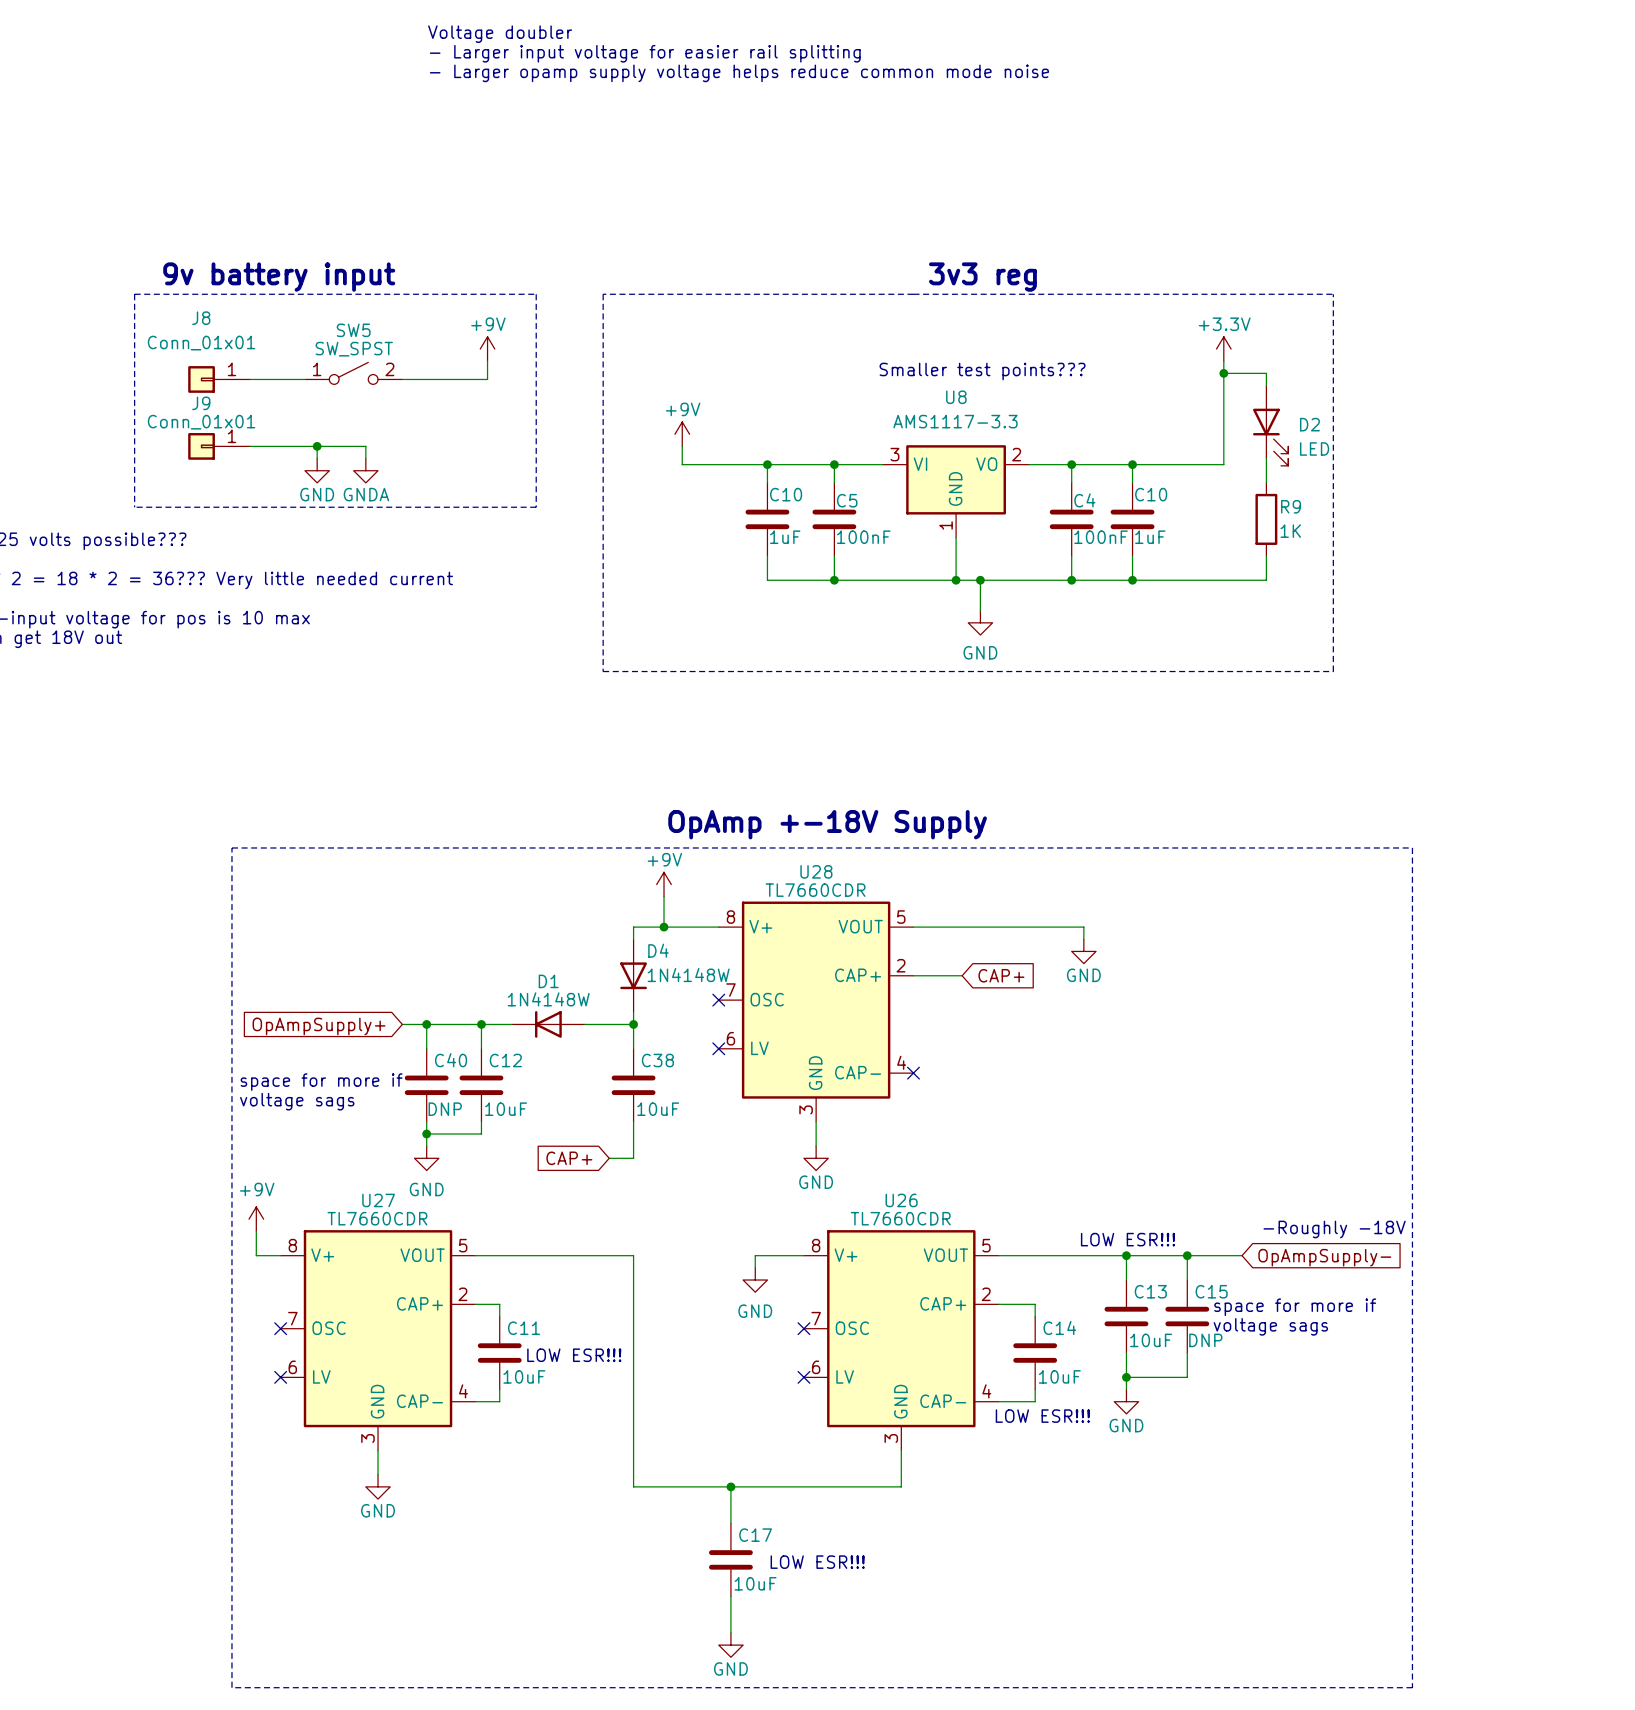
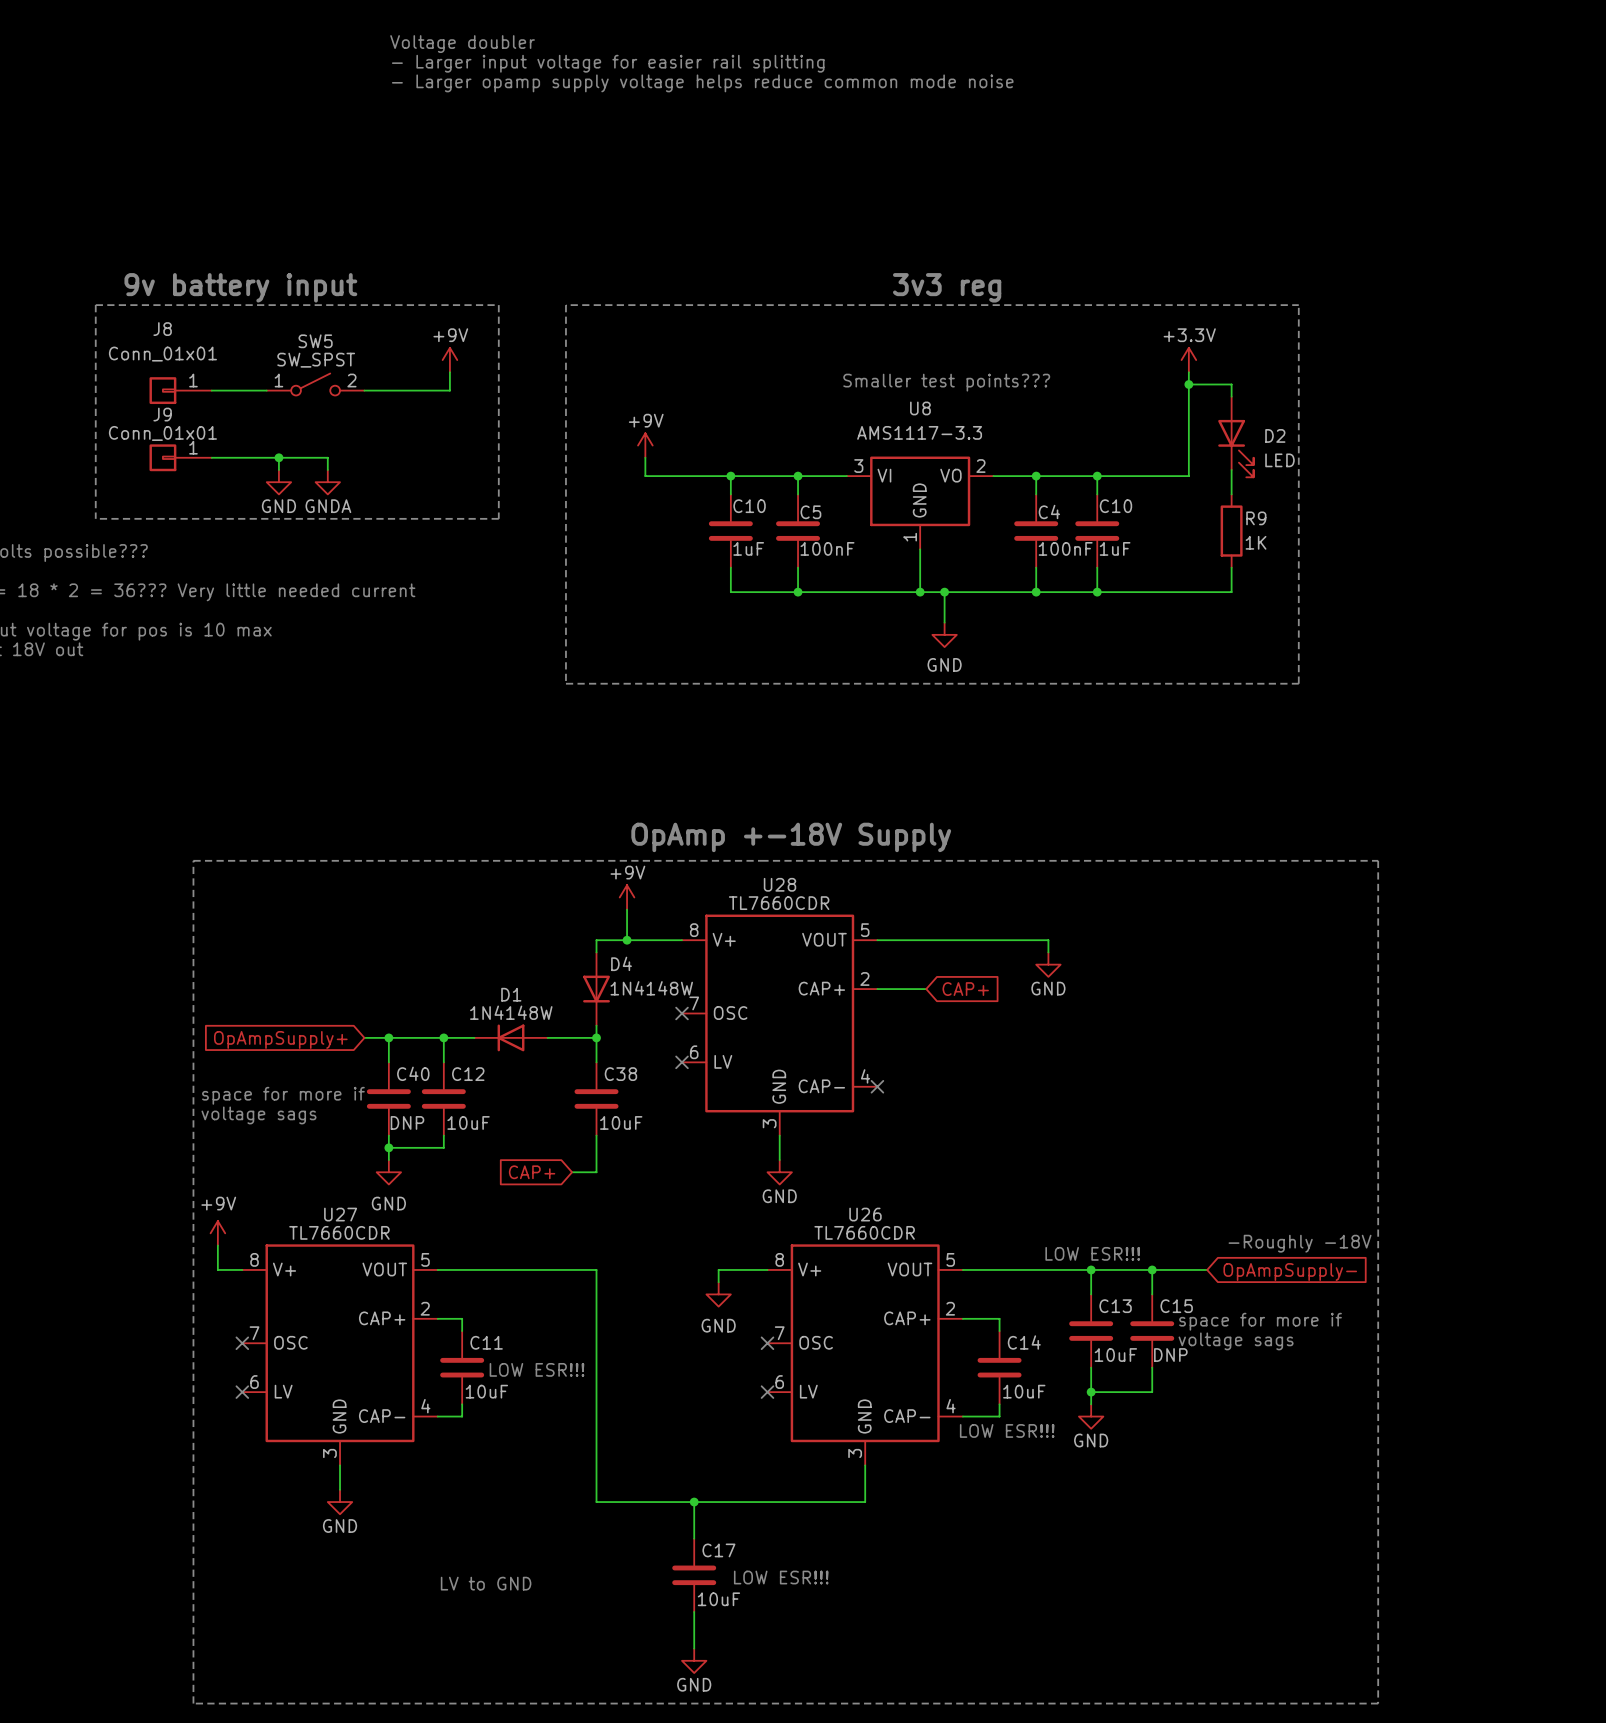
text: none -> LV to GND (486, 1583)

